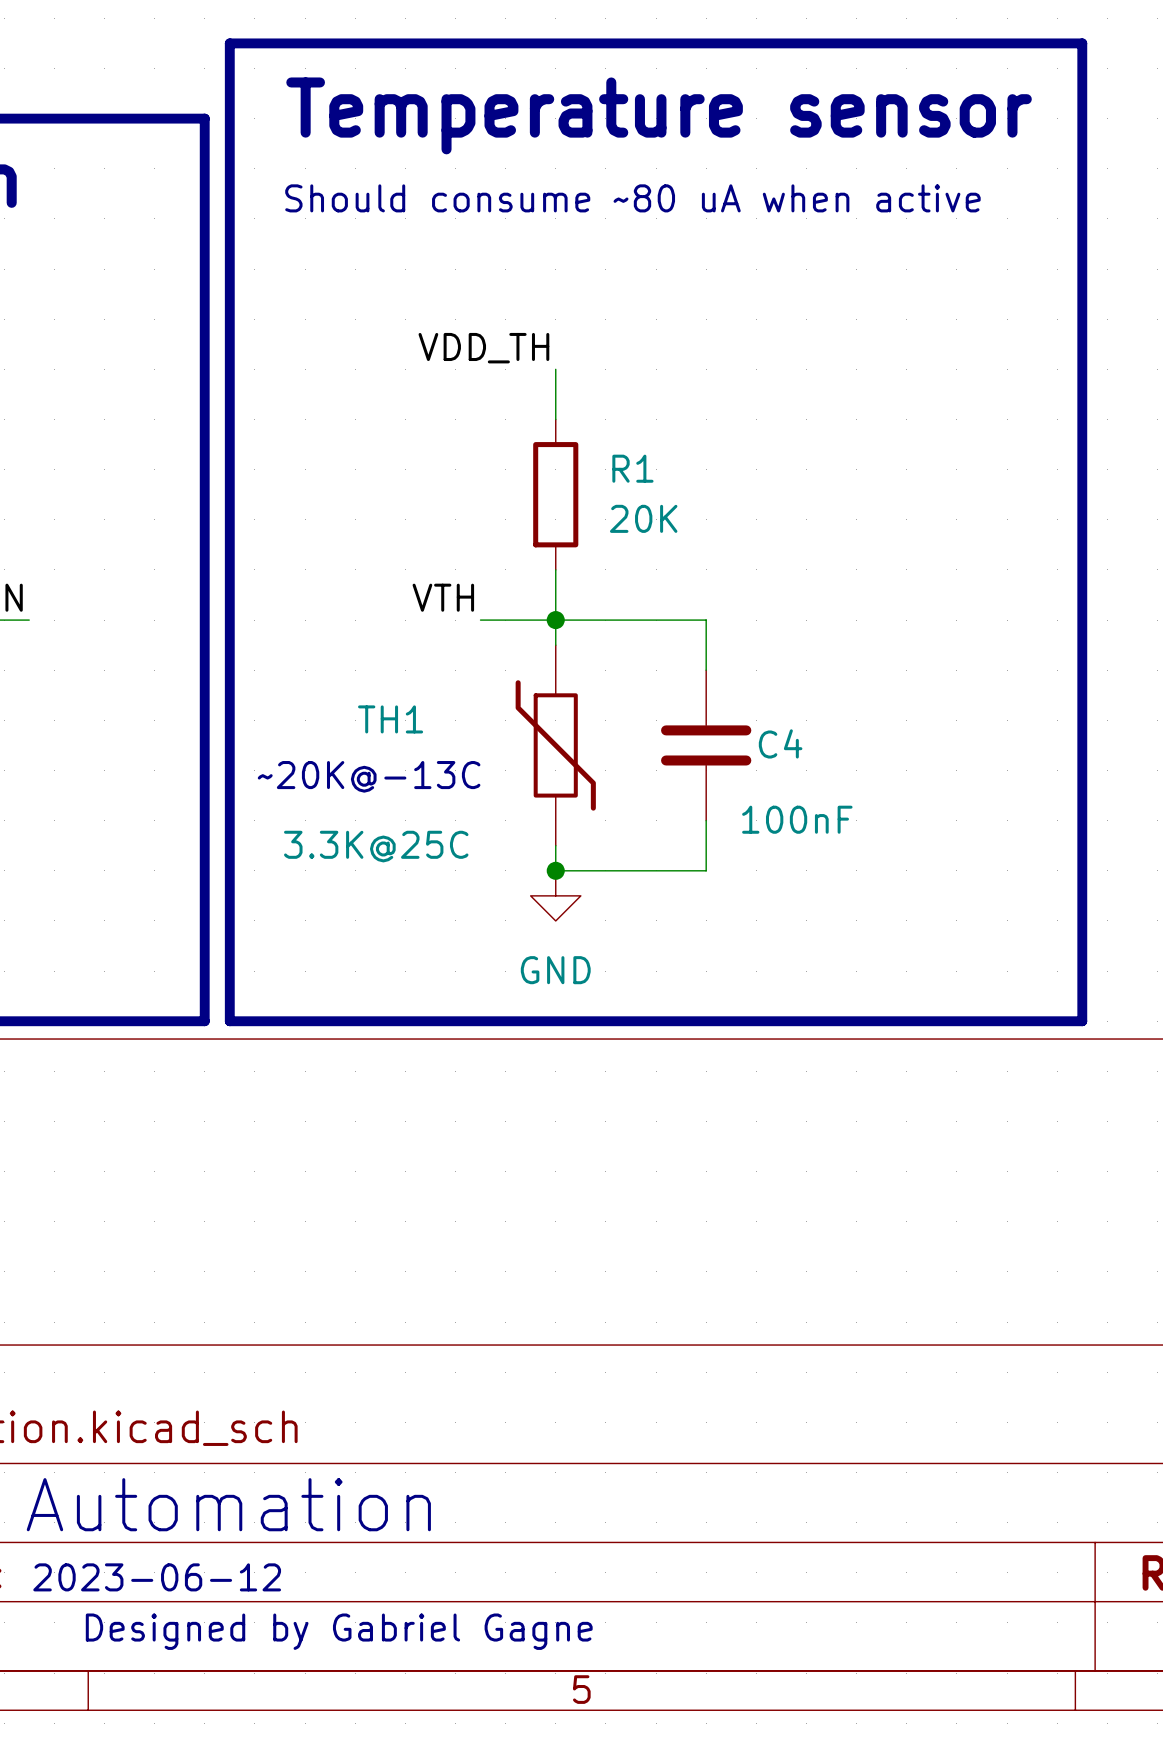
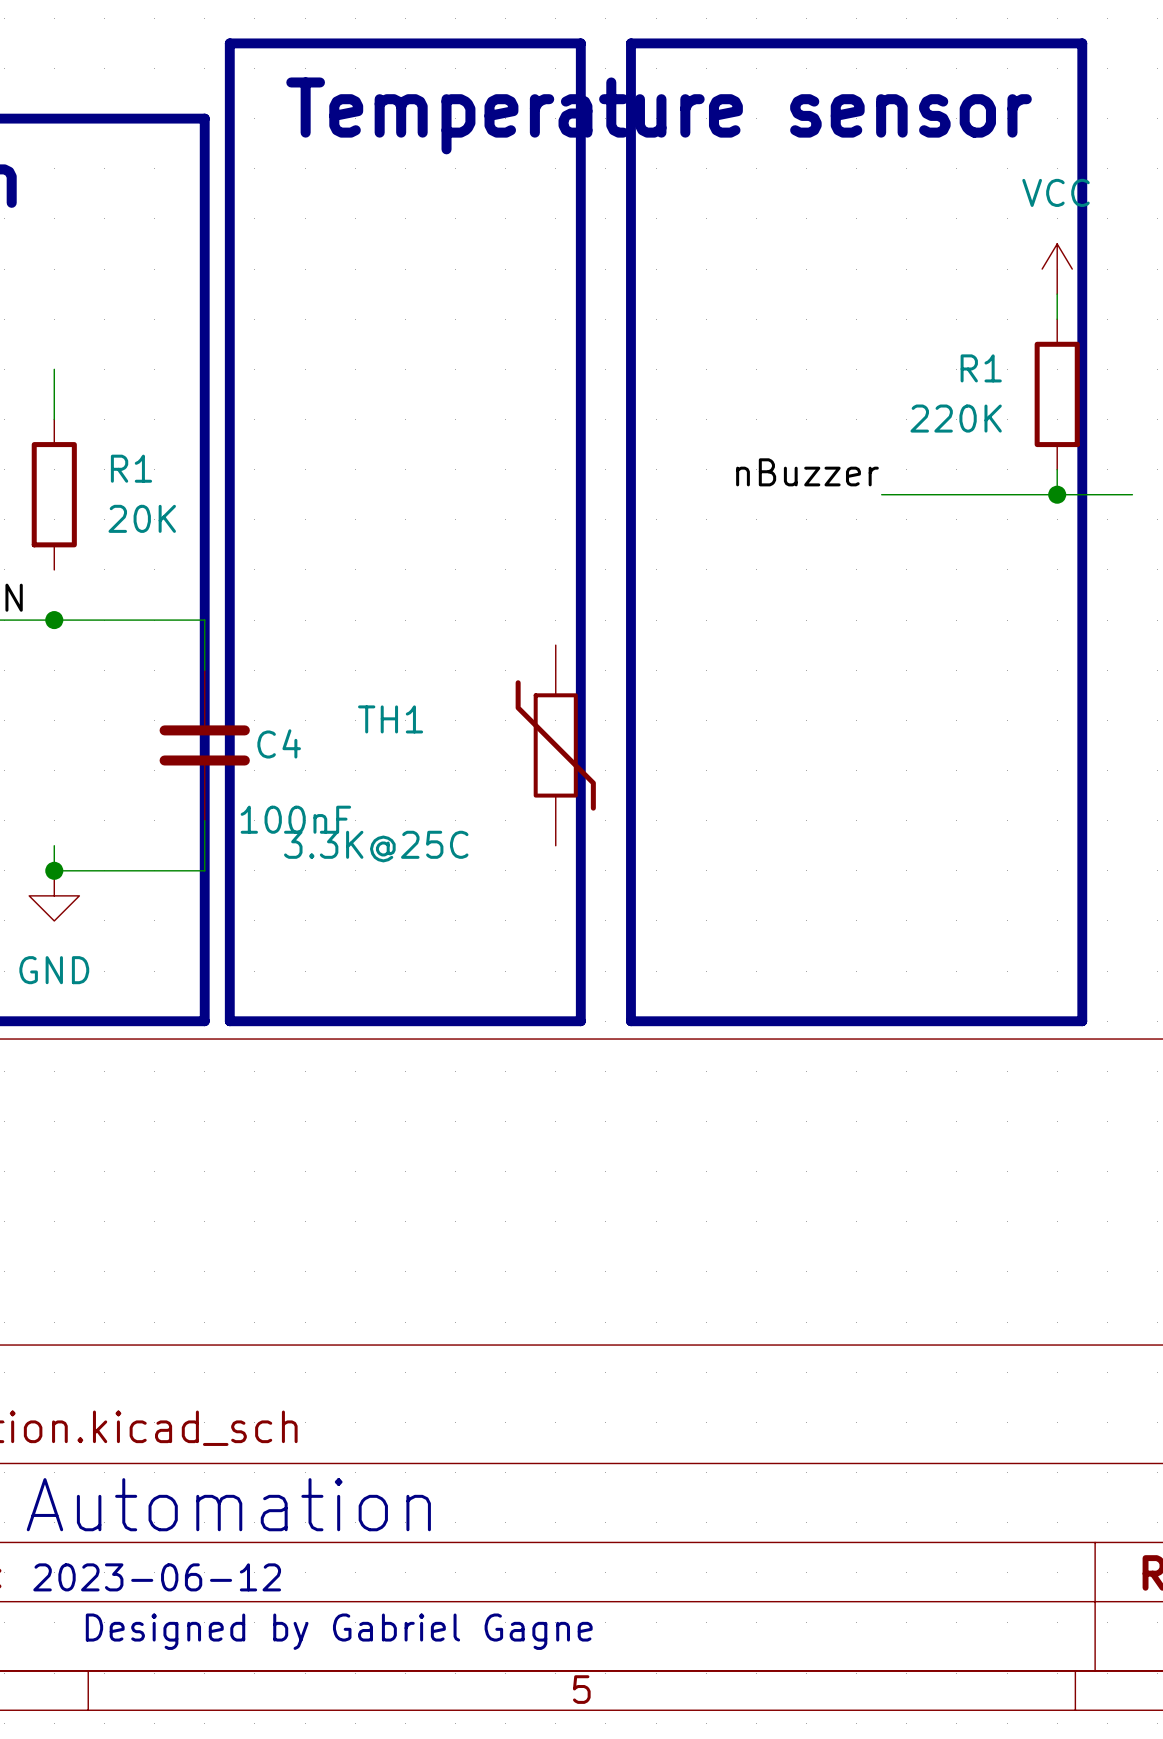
line: (580, 43) (630, 43) -> (580, 43) (580, 1021)
text: Should consume ~80 uA when active (632, 198) -> none
power symbol: none -> VCC (1057, 269)
wire: none -> (1057, 294) (1057, 319)
label: VDD_TH (483, 348) -> none
wire: none -> (54, 369) (54, 419)
wire: (555, 369) (555, 419) -> none
R1: none -> 220K (1057, 394)
wire: none -> (1057, 469) (1057, 494)
label: none -> nBuzzer (807, 472)
R1: none -> 20K (54, 494)
R1: 20K (555, 494) -> none
wire: none -> (881, 494) (1132, 494)
junction: none -> (1057, 494)
wire: (555, 569) (555, 645) -> none
label: VTH (443, 597) -> none
wire: none -> (29, 620) (204, 620) (204, 670)
junction: none -> (54, 620)
wire: (480, 620) (706, 620) (706, 670) -> none
junction: (555, 620) -> none
C4 position: (706, 745) -> (204, 745)
text: ~20K@-13C (369, 776) -> none
wire: none -> (204, 820) (204, 870) (54, 870) (54, 845)
wire: (706, 820) (706, 870) (555, 870) (555, 845) -> none
junction: none -> (54, 870)
junction: (555, 870) -> none
power symbol: none -> GND (54, 895)
power symbol: GND (555, 895) -> none
line: (580, 1021) (630, 1021) -> (630, 43) (630, 1021)

